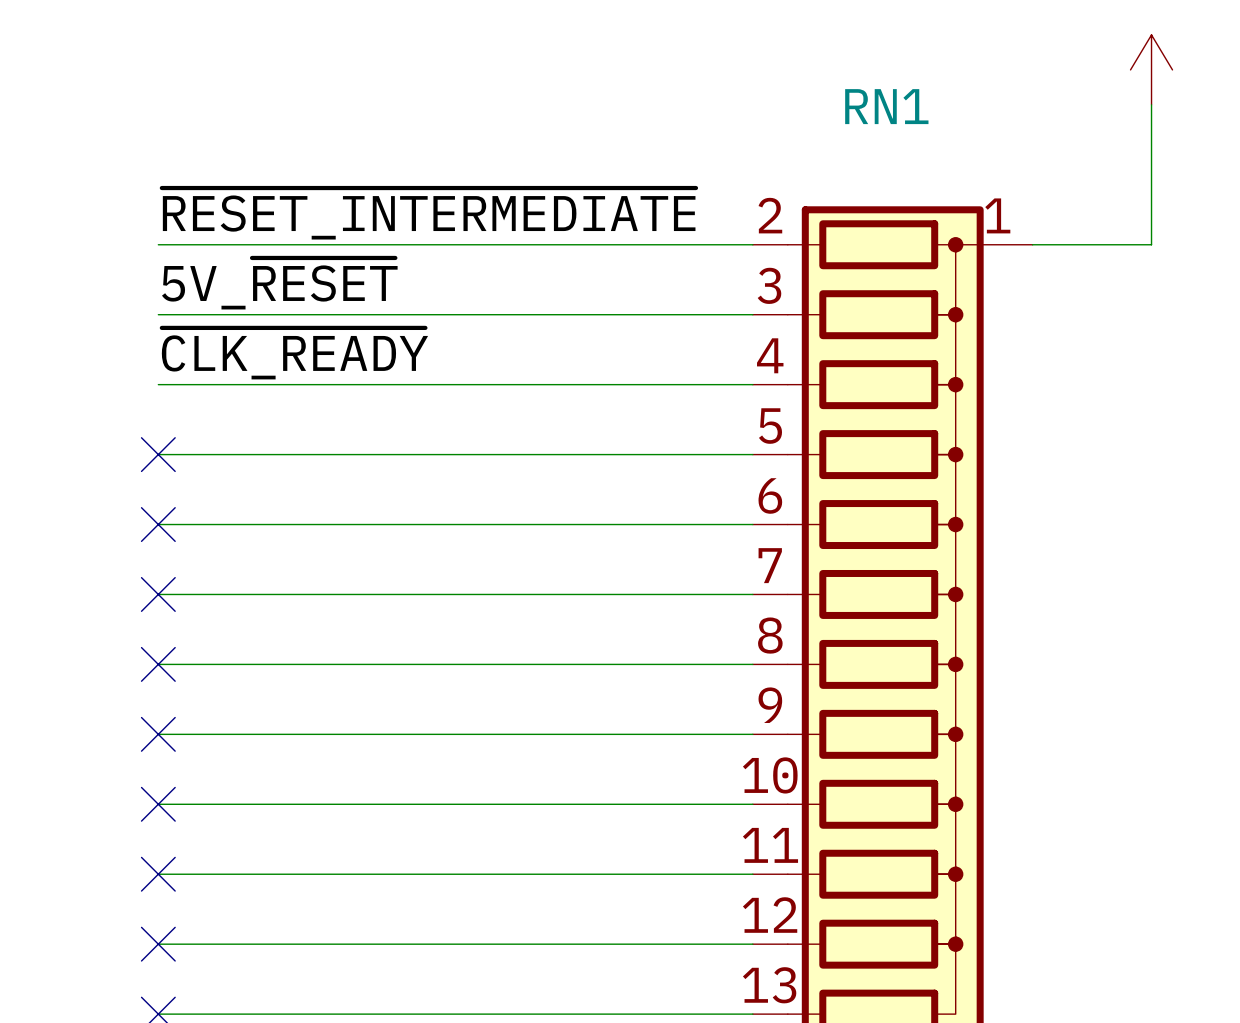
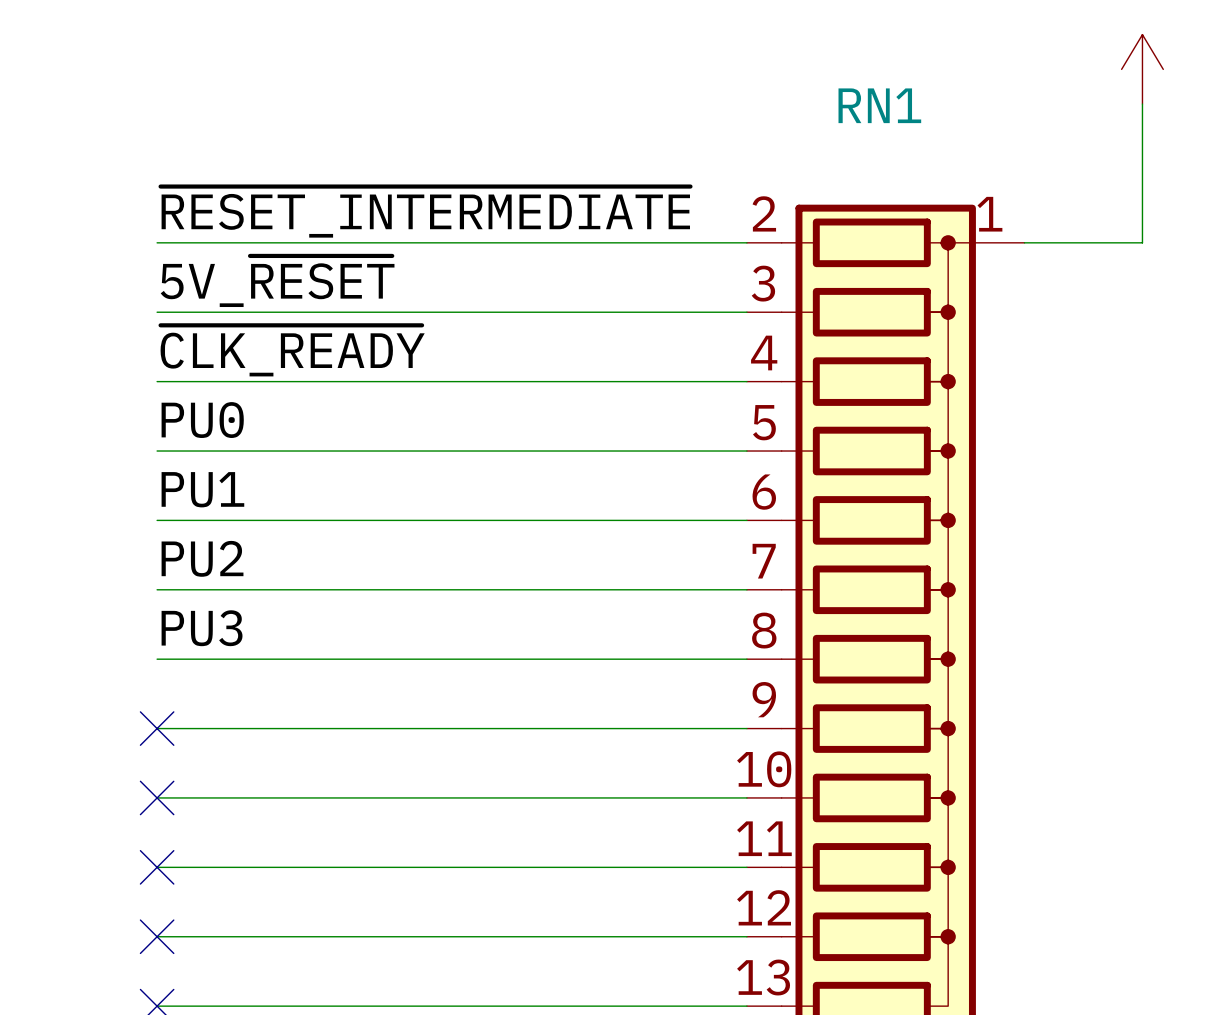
label: none -> PU0 (202, 420)
no-connect mark: (158, 454) -> none
label: none -> PU1 (202, 489)
no-connect mark: (158, 524) -> none
label: none -> PU2 (202, 558)
no-connect mark: (158, 594) -> none
label: none -> PU3 (202, 628)
no-connect mark: (158, 664) -> none

